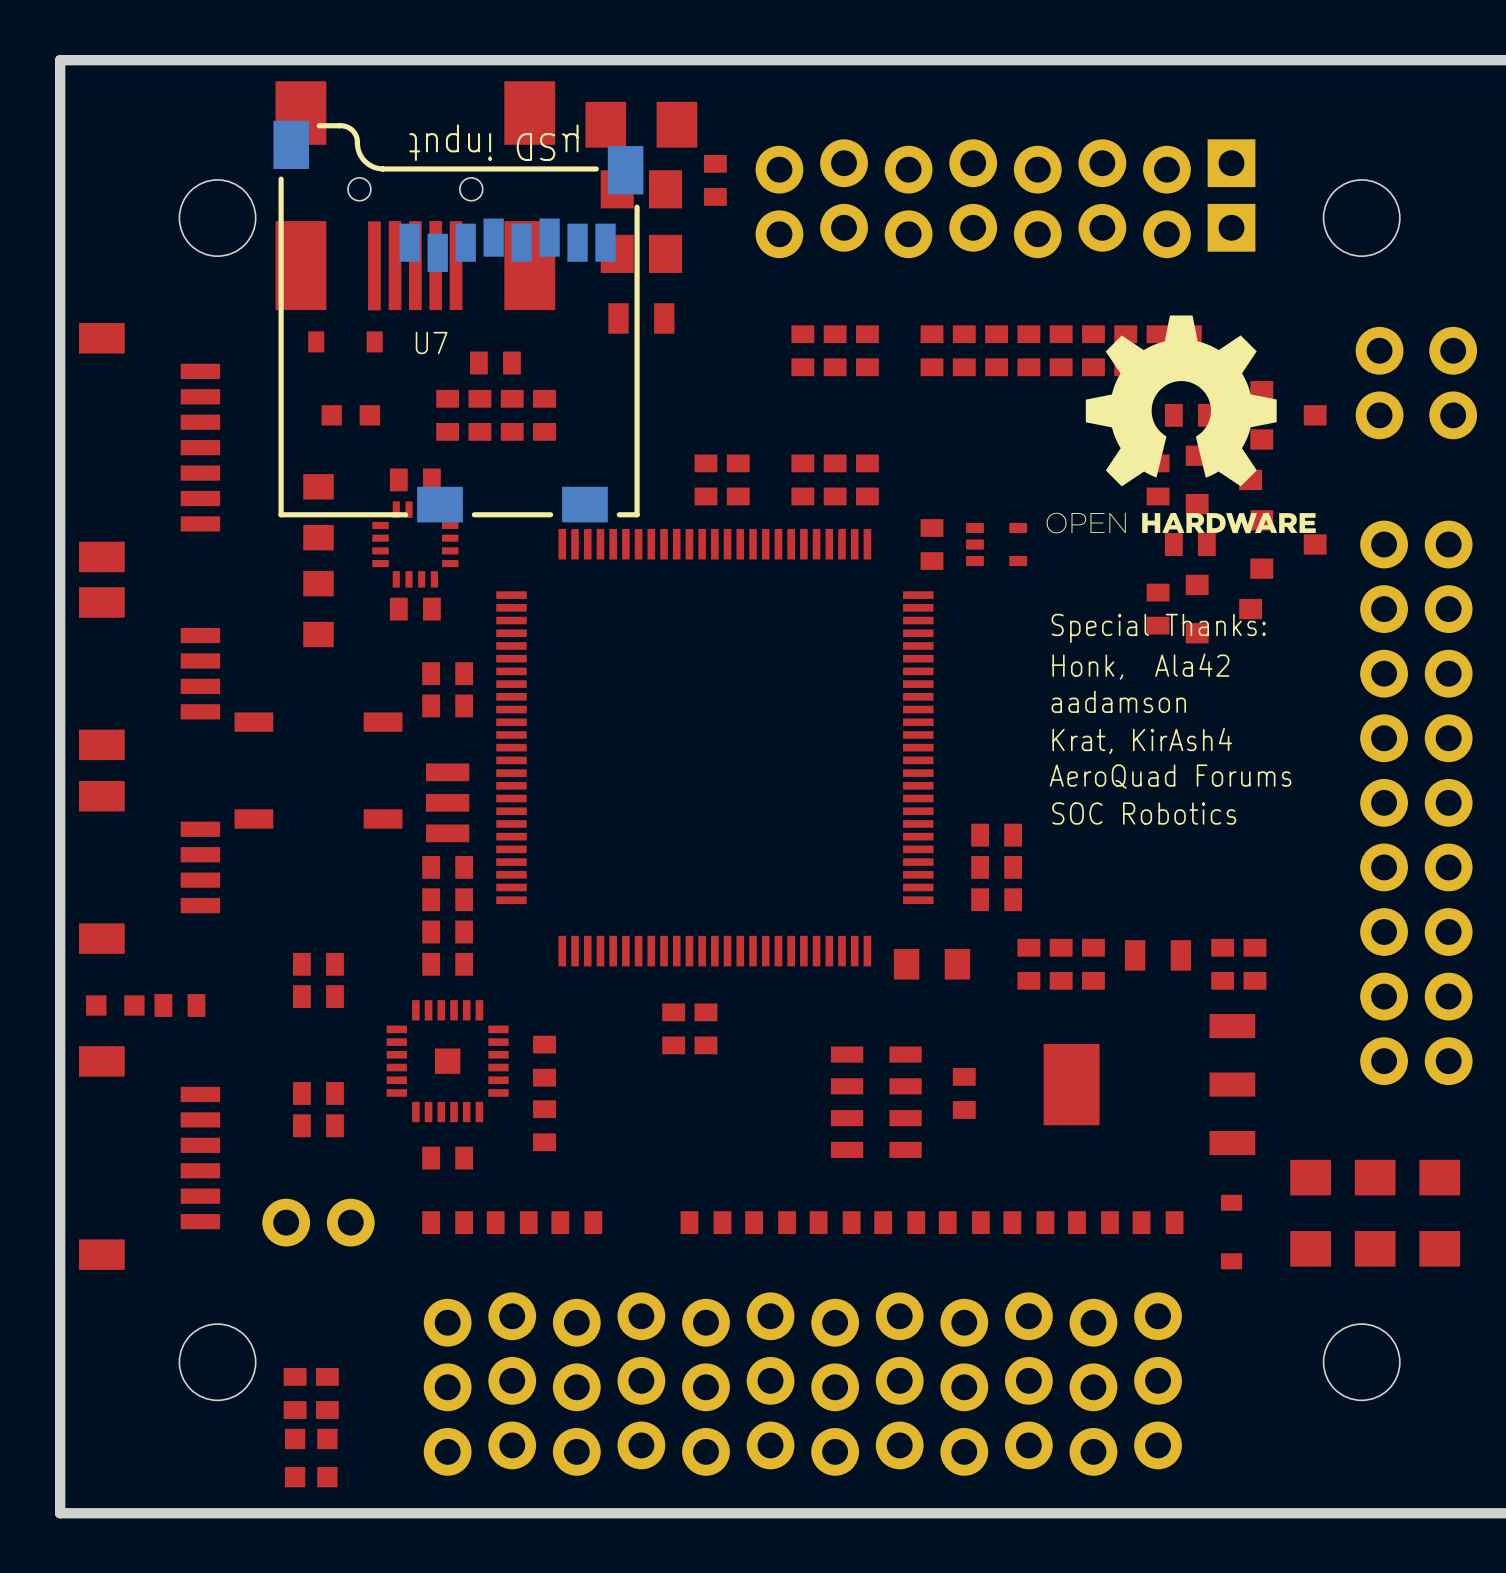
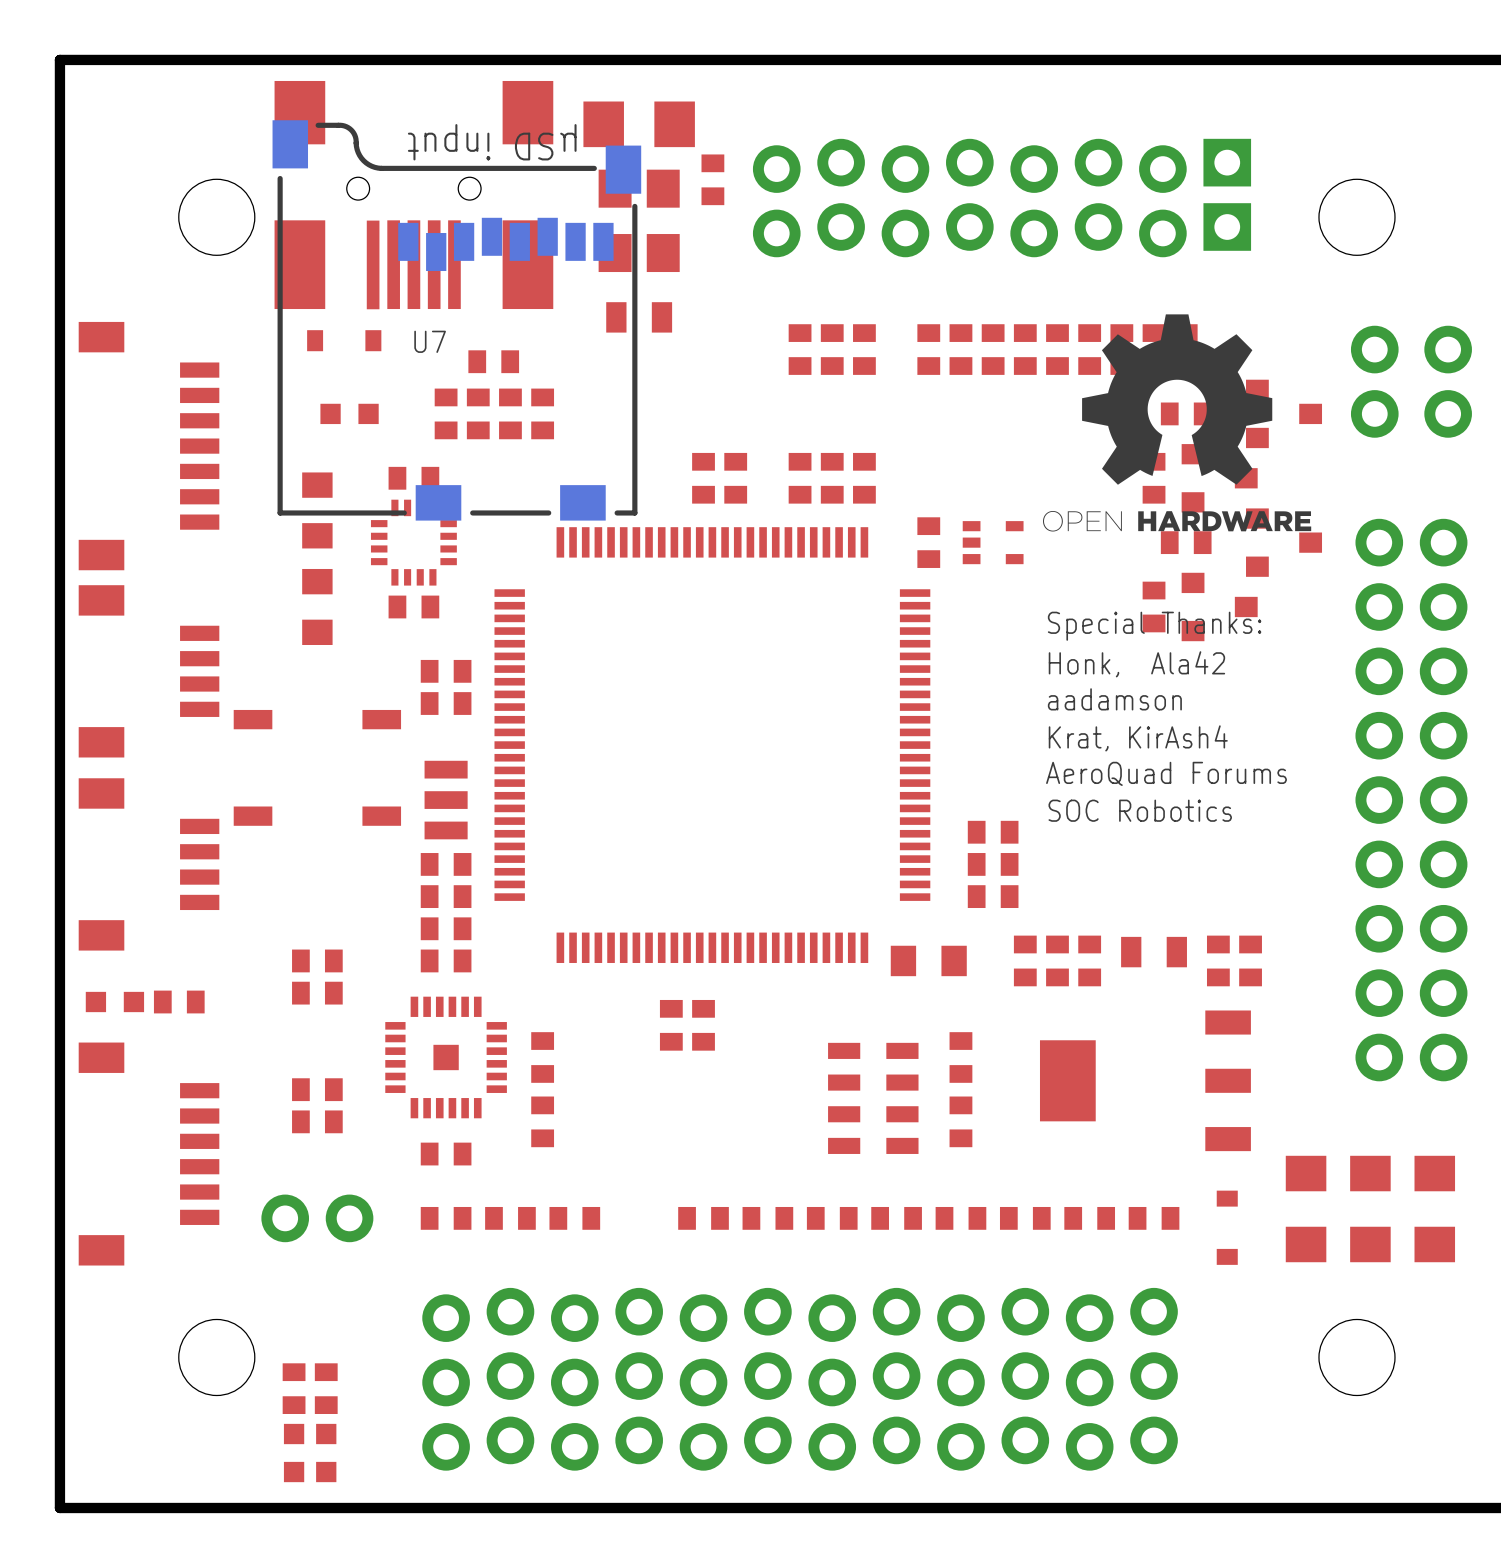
part: none -> (960, 1057)
part: (964, 1093) -> none
part: none -> (960, 1121)

